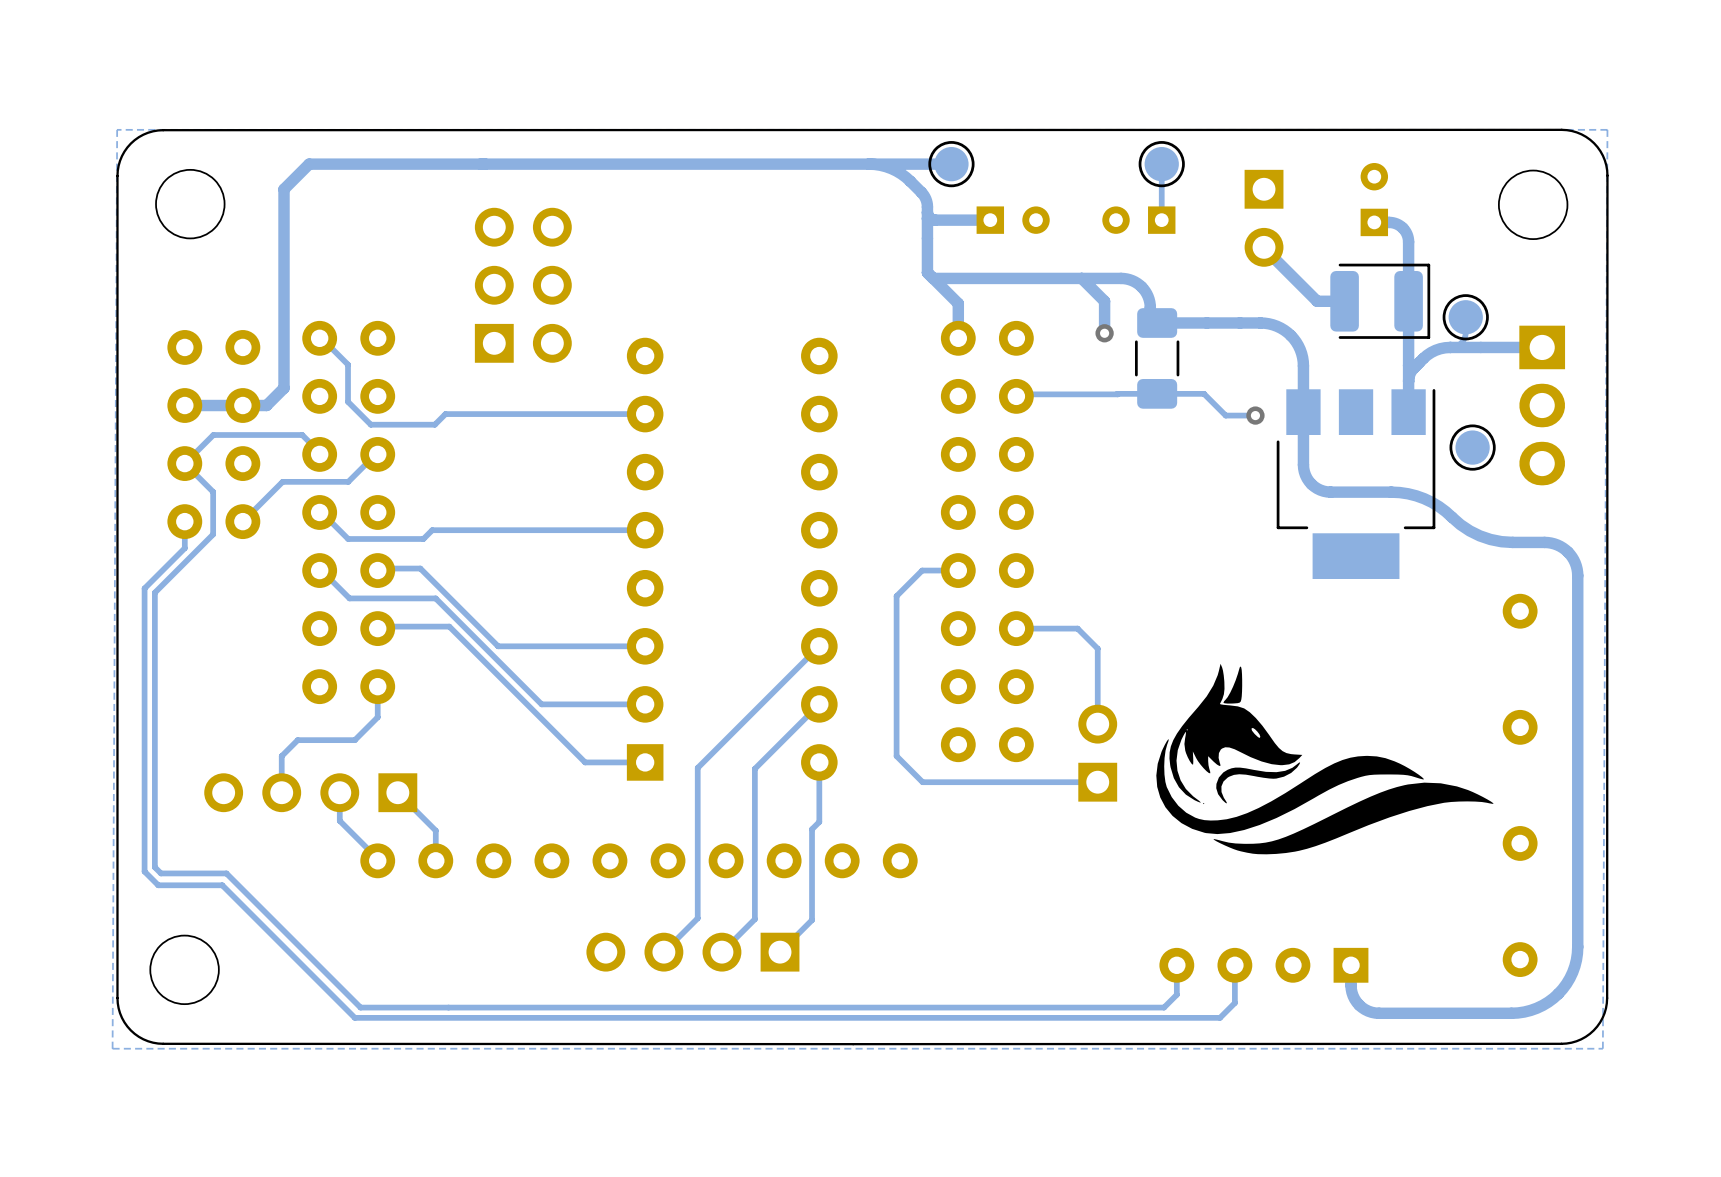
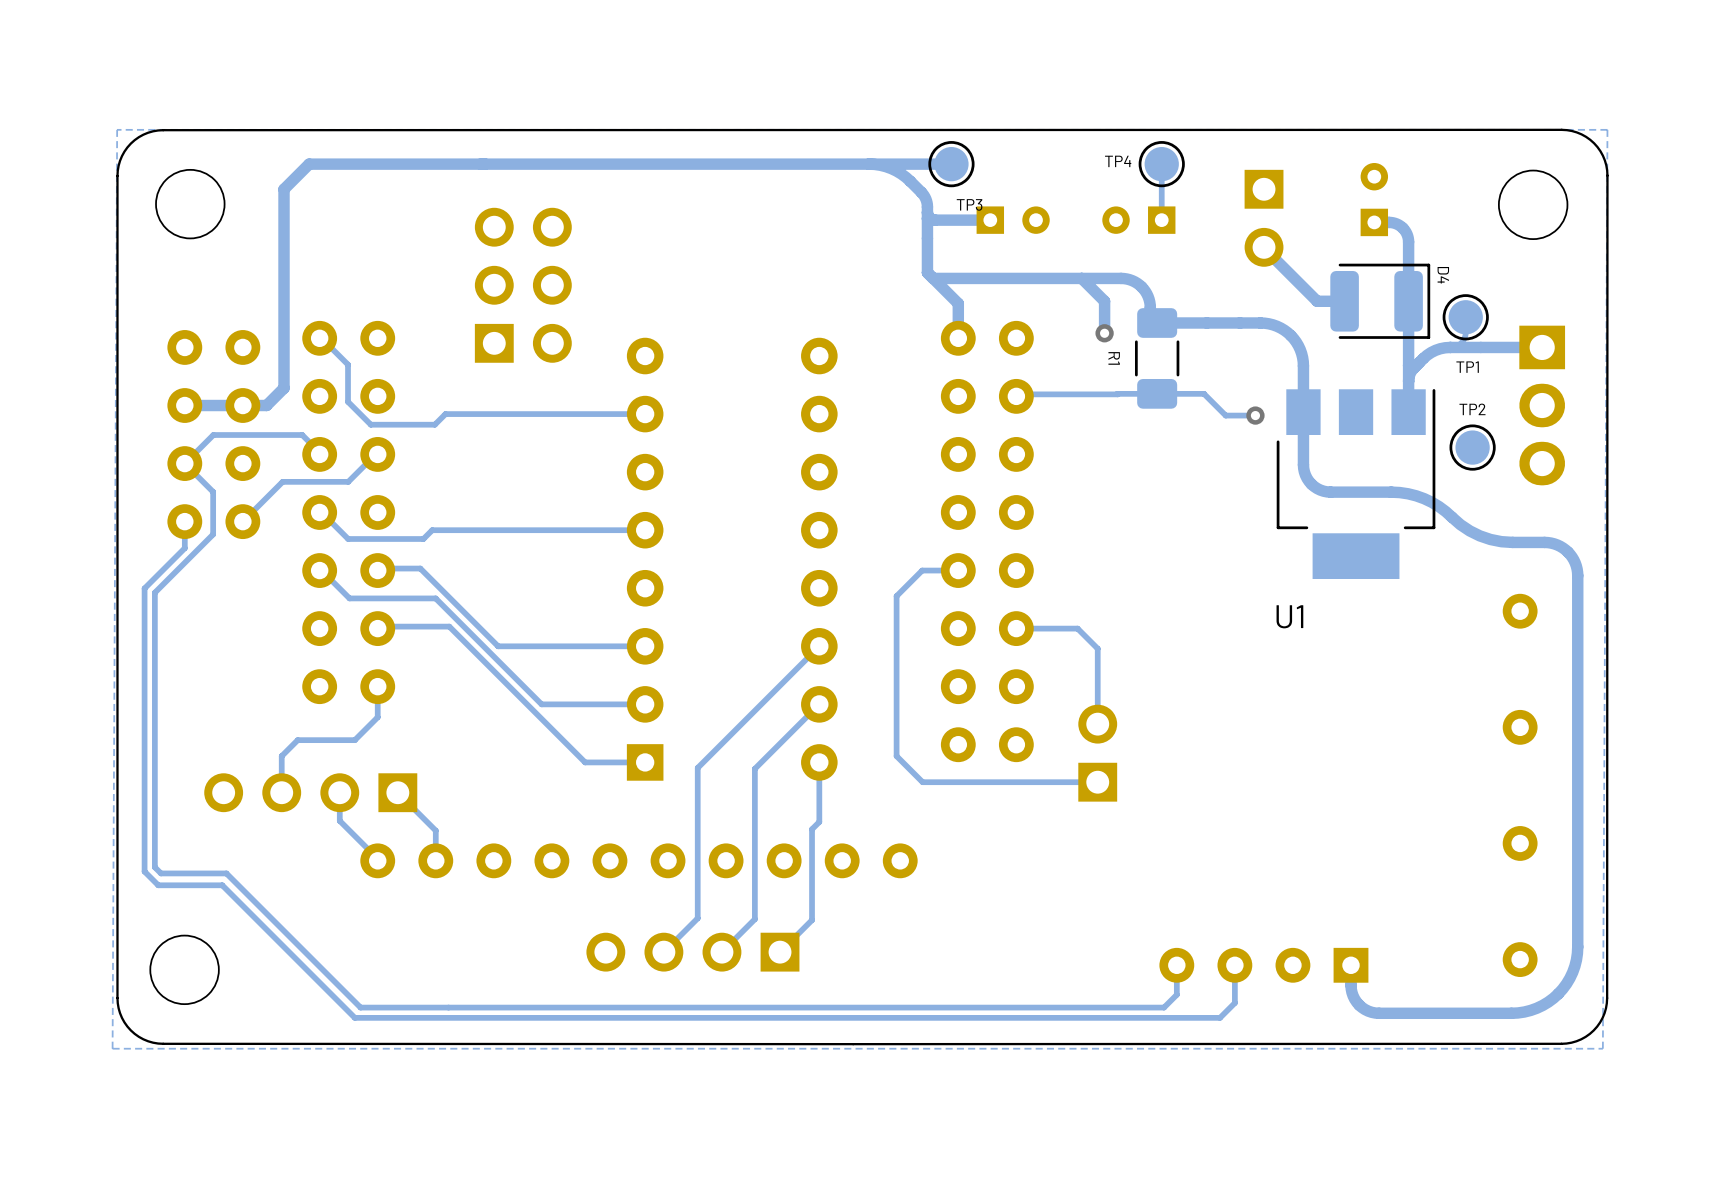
TP4 name: none -> TP4 (1118, 161)
TP3 name: none -> TP3 (969, 204)
D4 name: none -> D4 (1443, 275)
R1 name: none -> R1 (1114, 358)
TP1 name: none -> TP1 (1467, 367)
TP2 name: none -> TP2 (1472, 409)
U1 name: none -> U1 (1289, 616)
drawing: [1156, 663, 1494, 855] -> none

